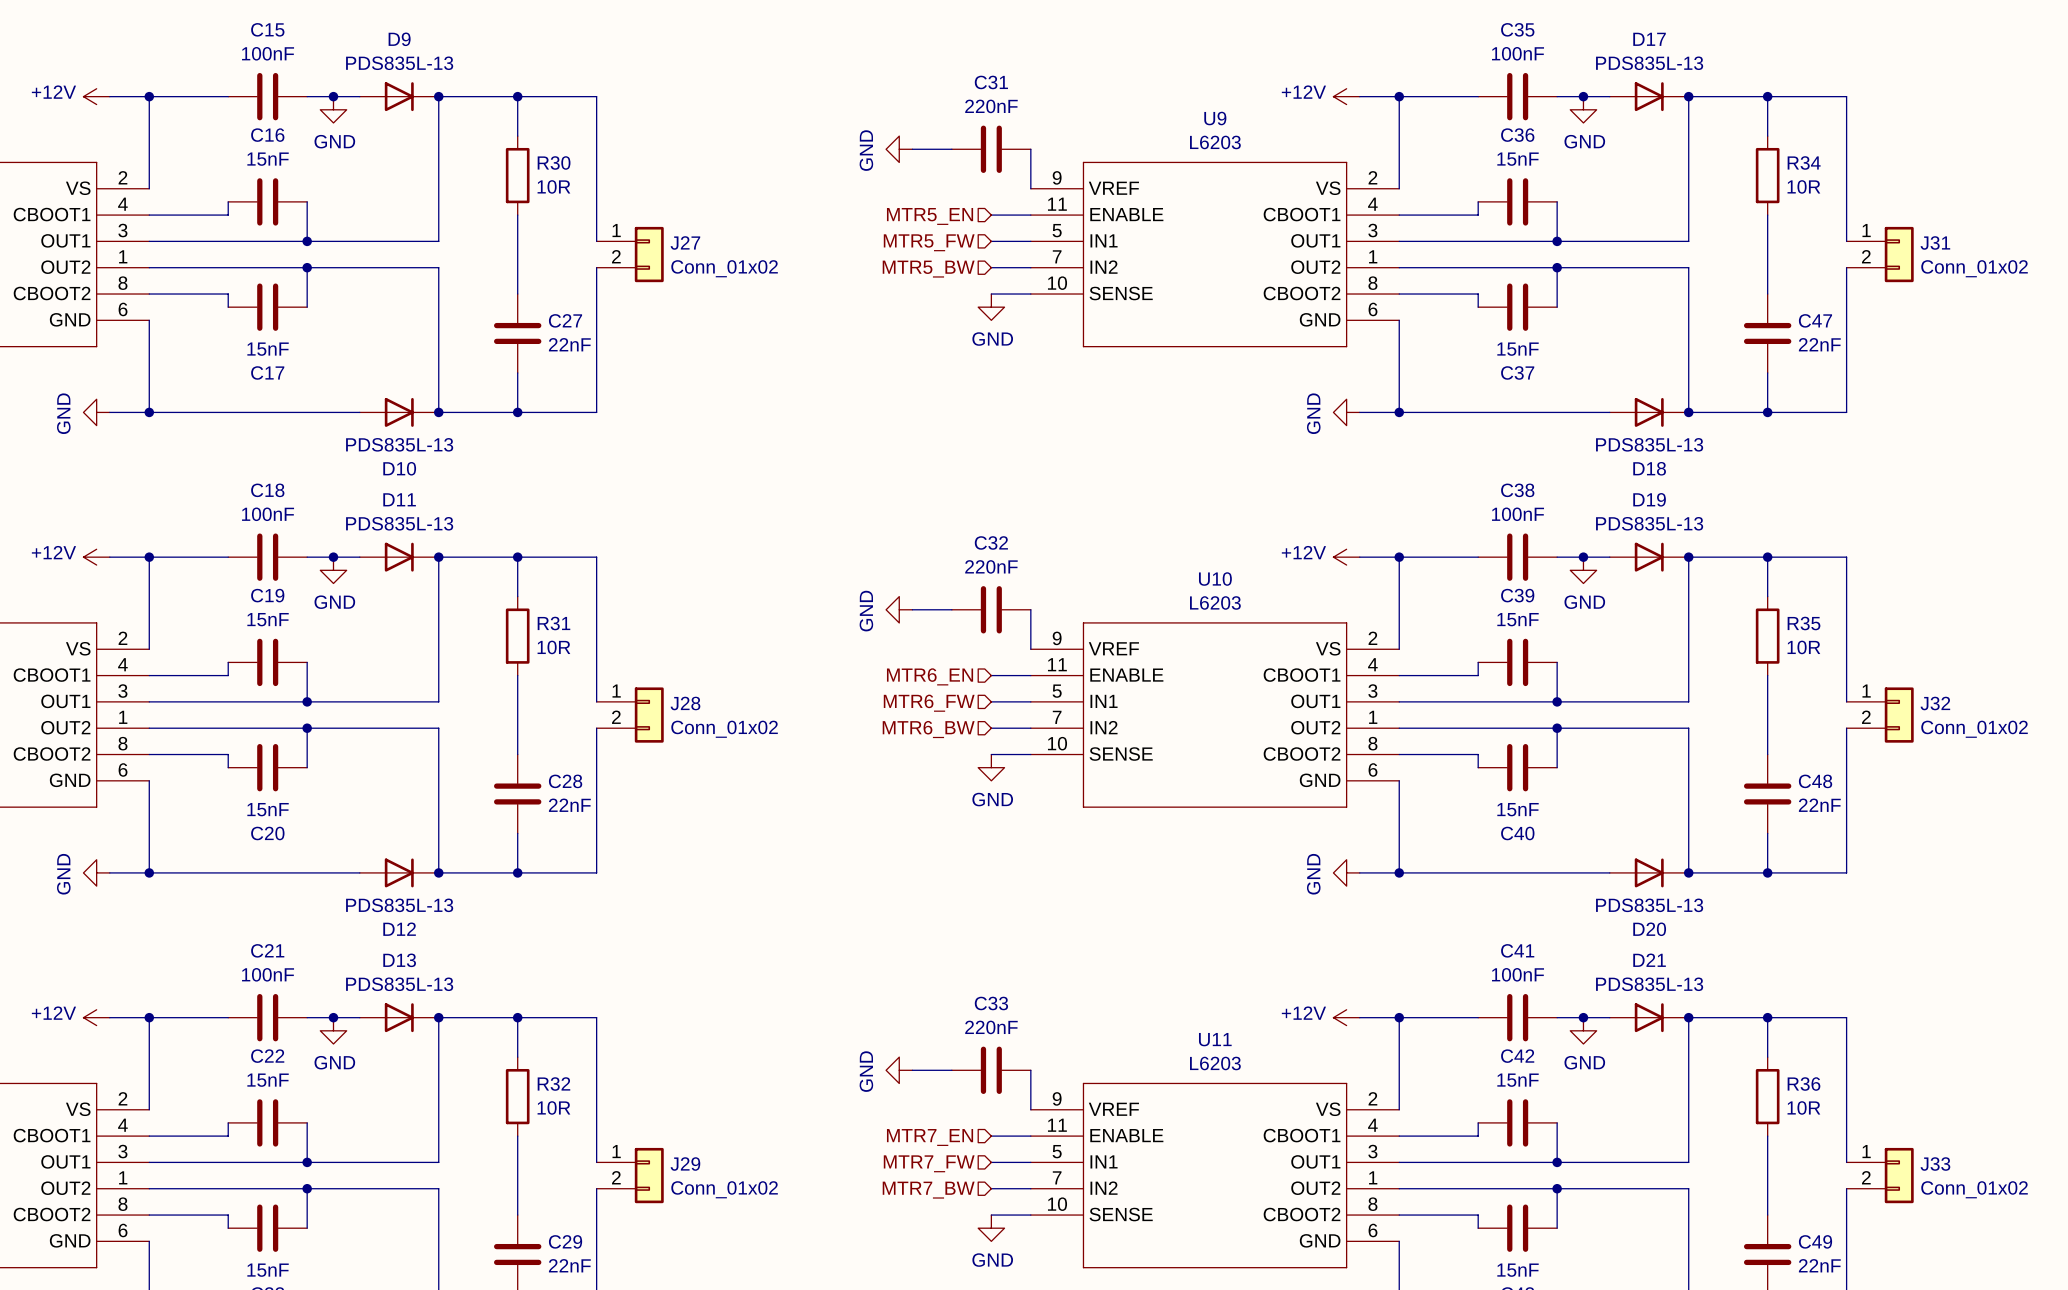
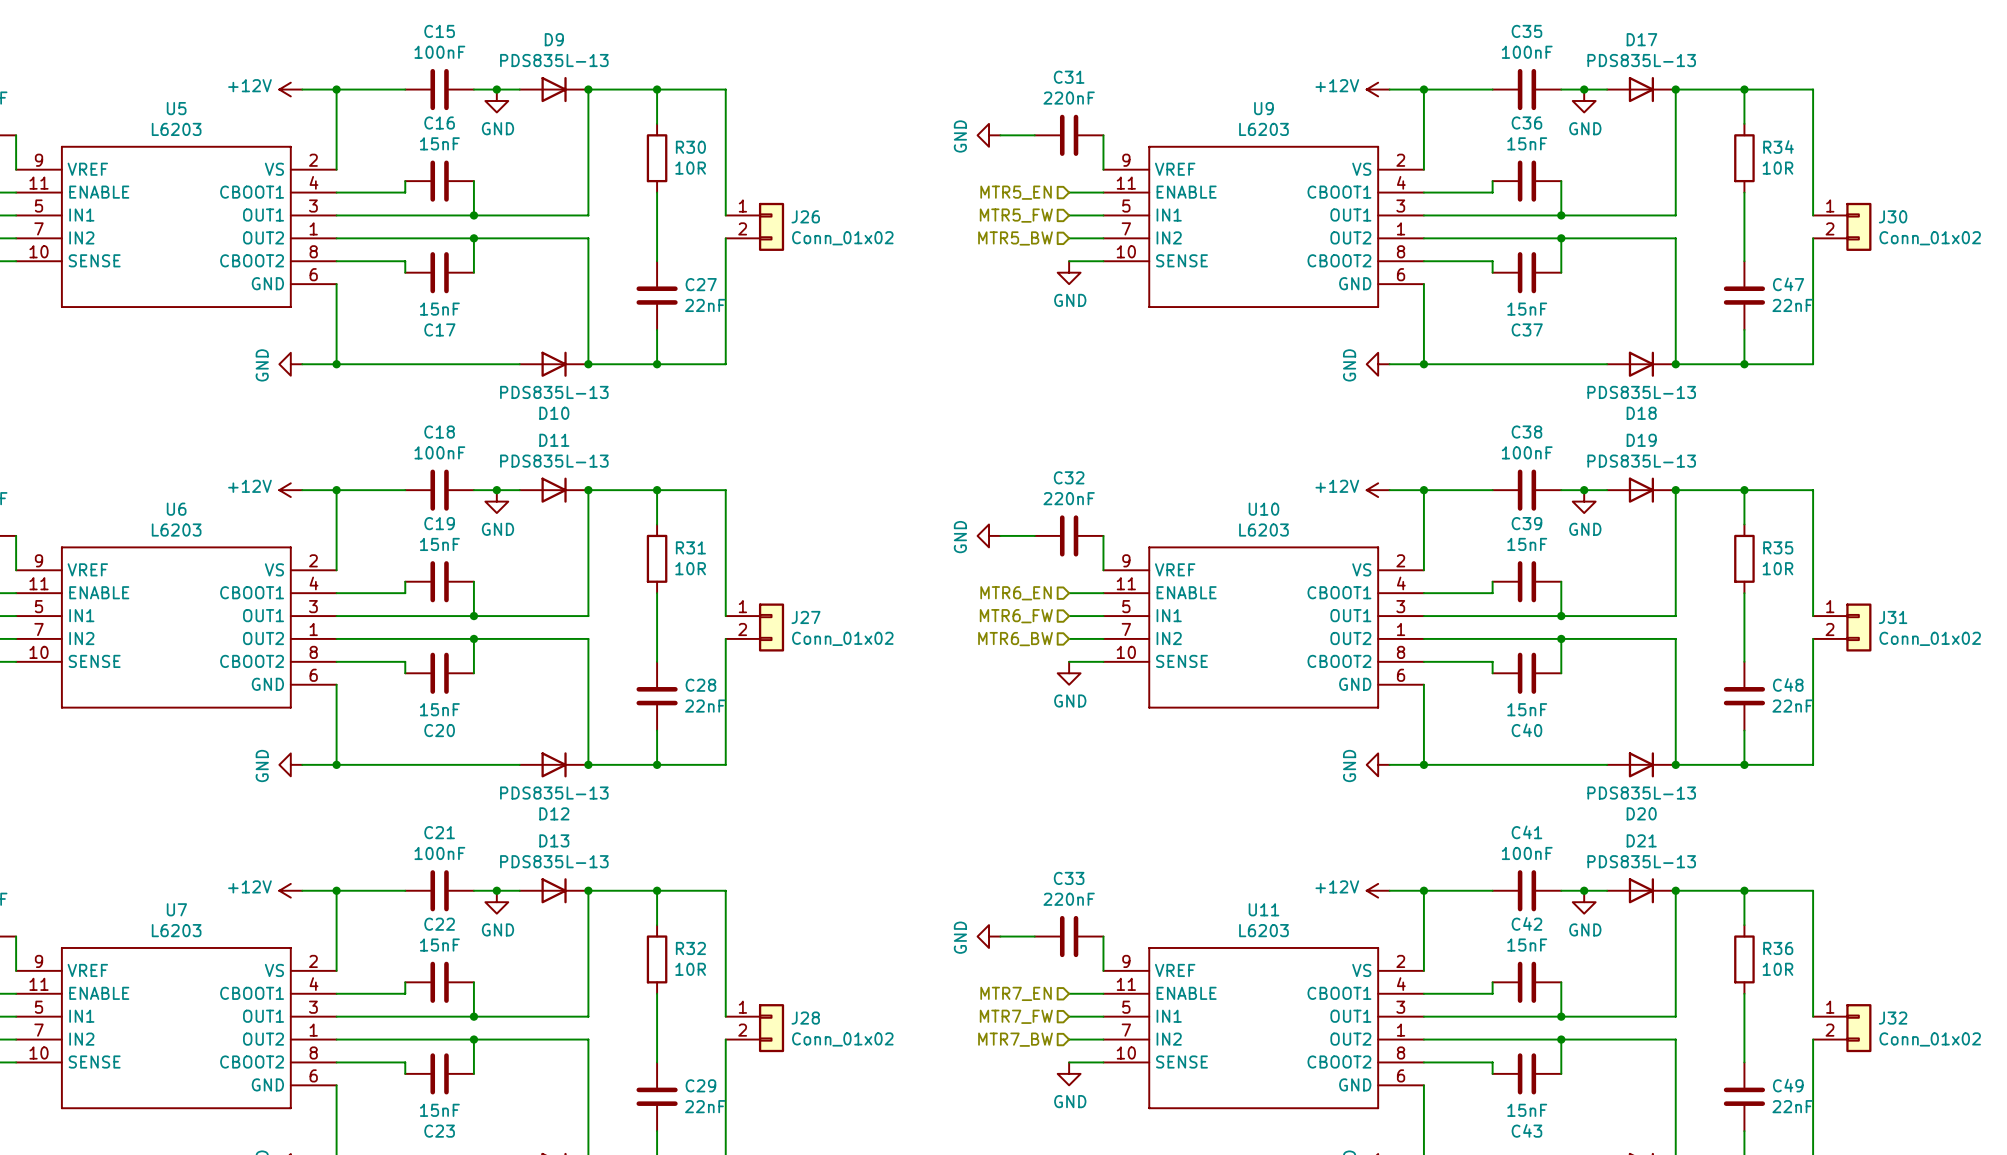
J27 name: J27 (685, 242) -> J26 (805, 216)
J31 name: J31 (1935, 242) -> J30 (1893, 216)
J28 name: J28 (685, 703) -> J27 (806, 617)
J32 name: J32 (1935, 703) -> J31 (1893, 617)
J29 name: J29 (685, 1164) -> J28 (805, 1018)
J33 name: J33 (1935, 1164) -> J32 (1893, 1018)

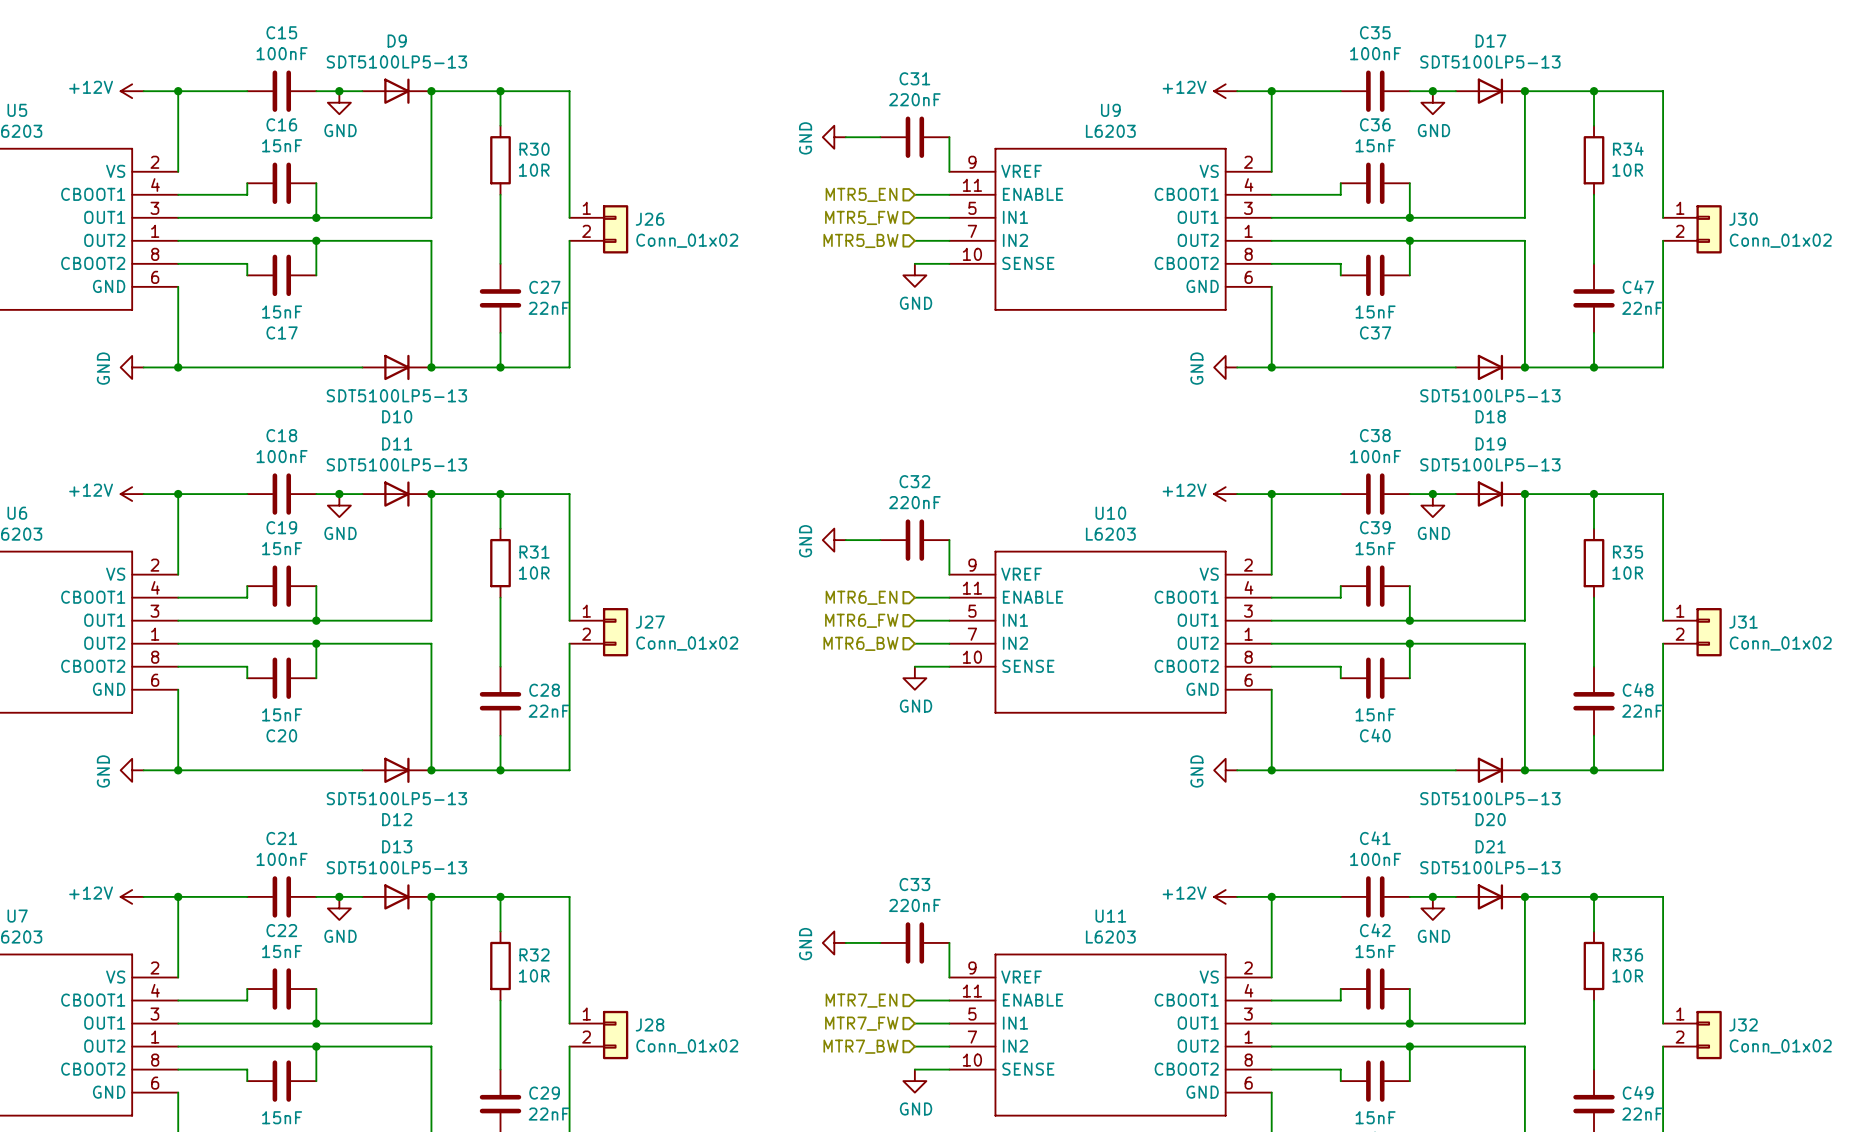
D9 value: PDS835L-13 (554, 60) -> SDT5100LP5-13 (396, 61)
D17 value: PDS835L-13 (1641, 60) -> SDT5100LP5-13 (1490, 61)
D10 value: PDS835L-13 (554, 392) -> SDT5100LP5-13 (396, 395)
D18 value: PDS835L-13 (1641, 392) -> SDT5100LP5-13 (1490, 395)
D11 value: PDS835L-13 (554, 461) -> SDT5100LP5-13 (396, 464)
D19 value: PDS835L-13 (1641, 461) -> SDT5100LP5-13 (1490, 464)
D12 value: PDS835L-13 (554, 793) -> SDT5100LP5-13 (396, 798)
D20 value: PDS835L-13 (1641, 793) -> SDT5100LP5-13 (1490, 798)
D13 value: PDS835L-13 (554, 861) -> SDT5100LP5-13 (396, 867)
D21 value: PDS835L-13 (1641, 861) -> SDT5100LP5-13 (1490, 867)

